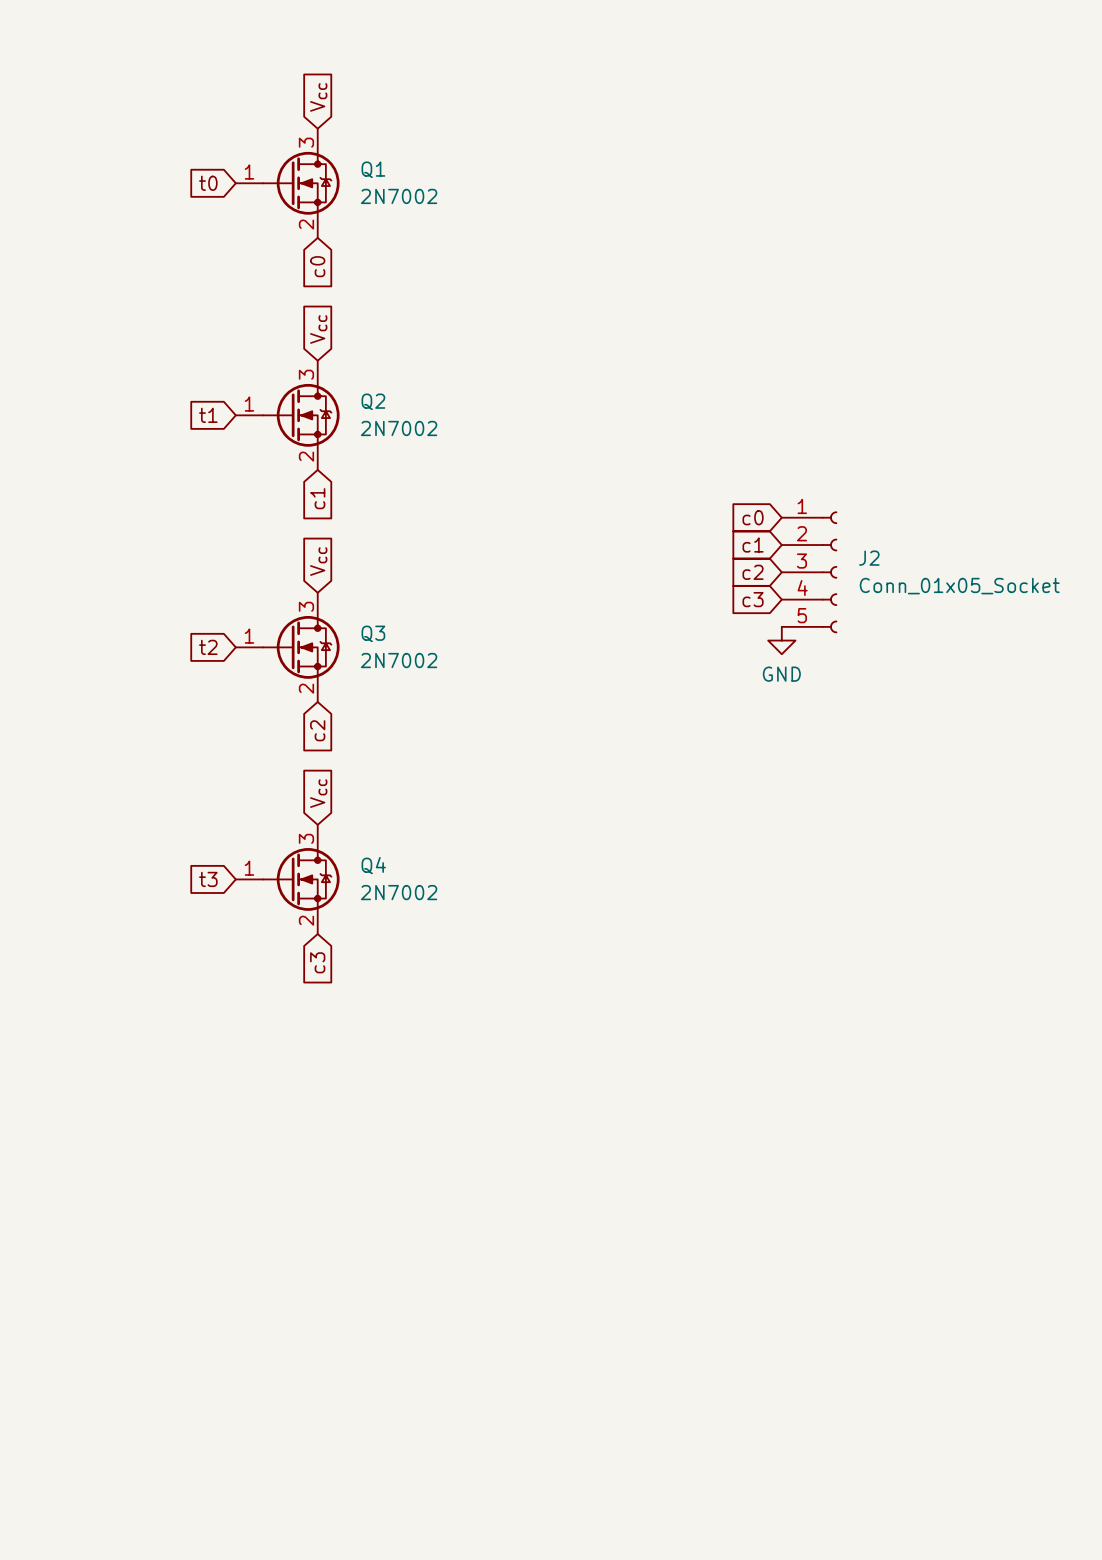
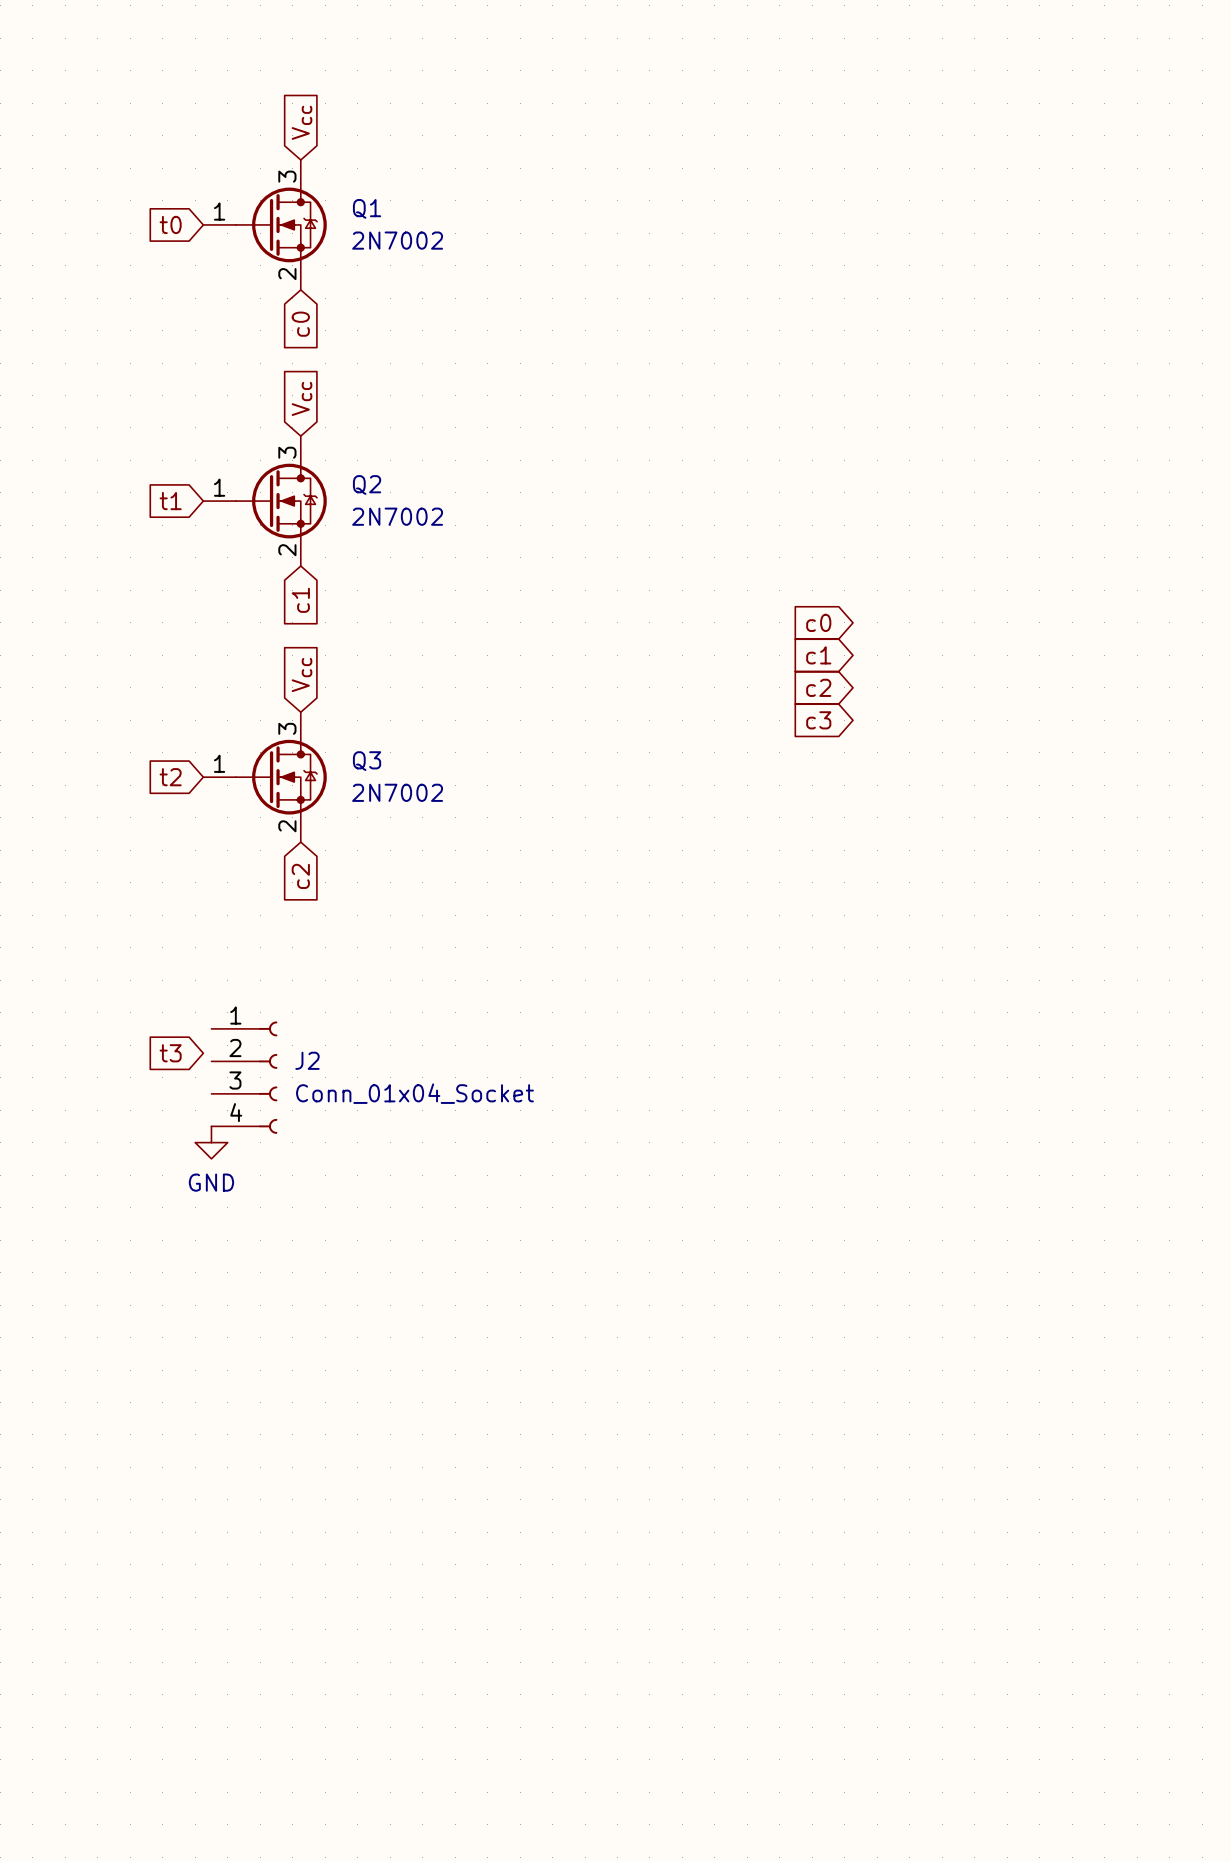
J2 symbol: [781, 511, 838, 634] -> [211, 1021, 278, 1134]
J2 value: Conn_01x05_Socket (959, 586) -> Conn_01x04_Socket (414, 1093)
power symbol: GND (781, 640) -> none
global label: Vcc (318, 793) -> none
Q4: 2N7002 (287, 879) -> none
power symbol: none -> GND (211, 1142)
global label: c3 (317, 962) -> none

